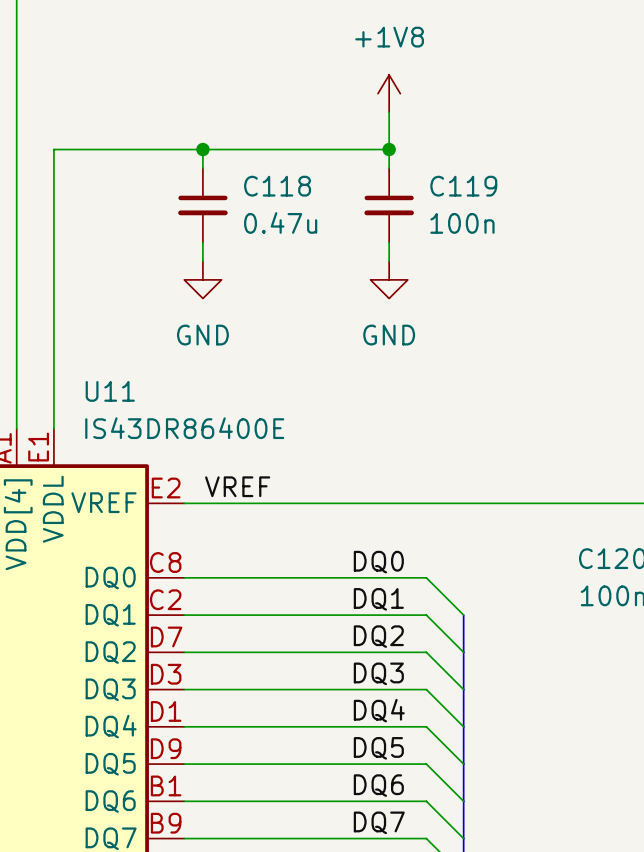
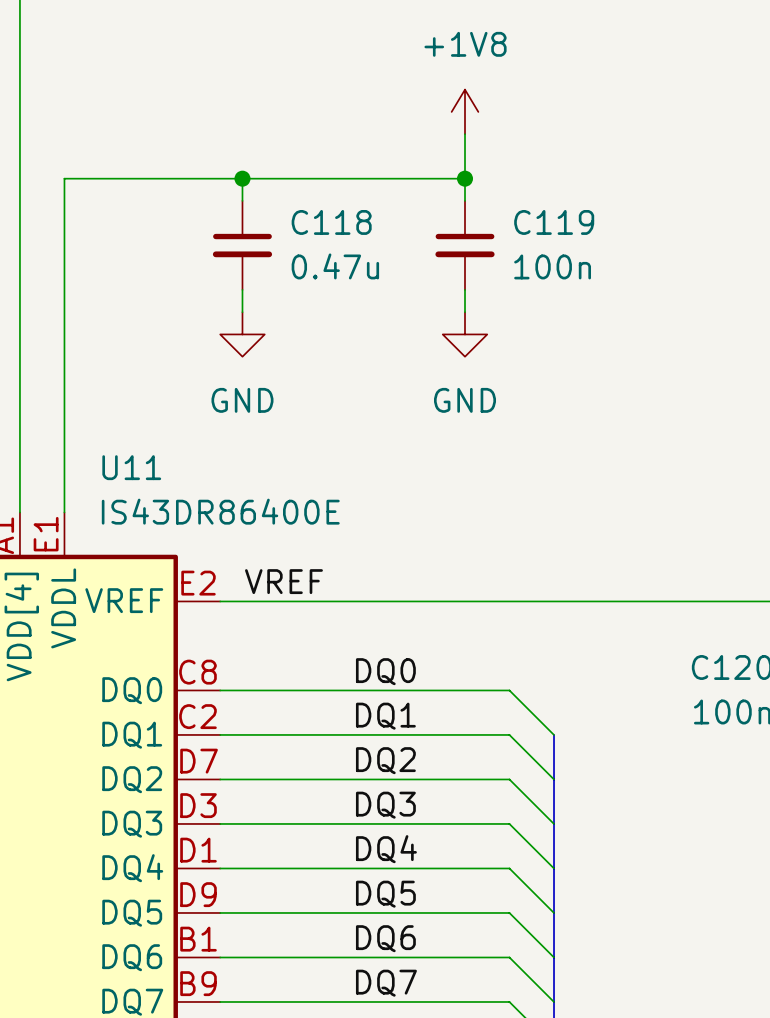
label position: DQ0 (378, 562) -> DQ0 (385, 671)
label position: DQ1 (378, 599) -> DQ1 (385, 716)
label position: DQ2 (378, 636) -> DQ2 (385, 760)
label position: DQ3 (378, 673) -> DQ3 (385, 805)
label position: DQ4 (379, 710) -> DQ4 (386, 849)
label position: DQ5 (378, 748) -> DQ5 (385, 894)
label position: DQ6 (378, 785) -> DQ6 (385, 938)
label position: DQ7 (379, 822) -> DQ7 (386, 983)

